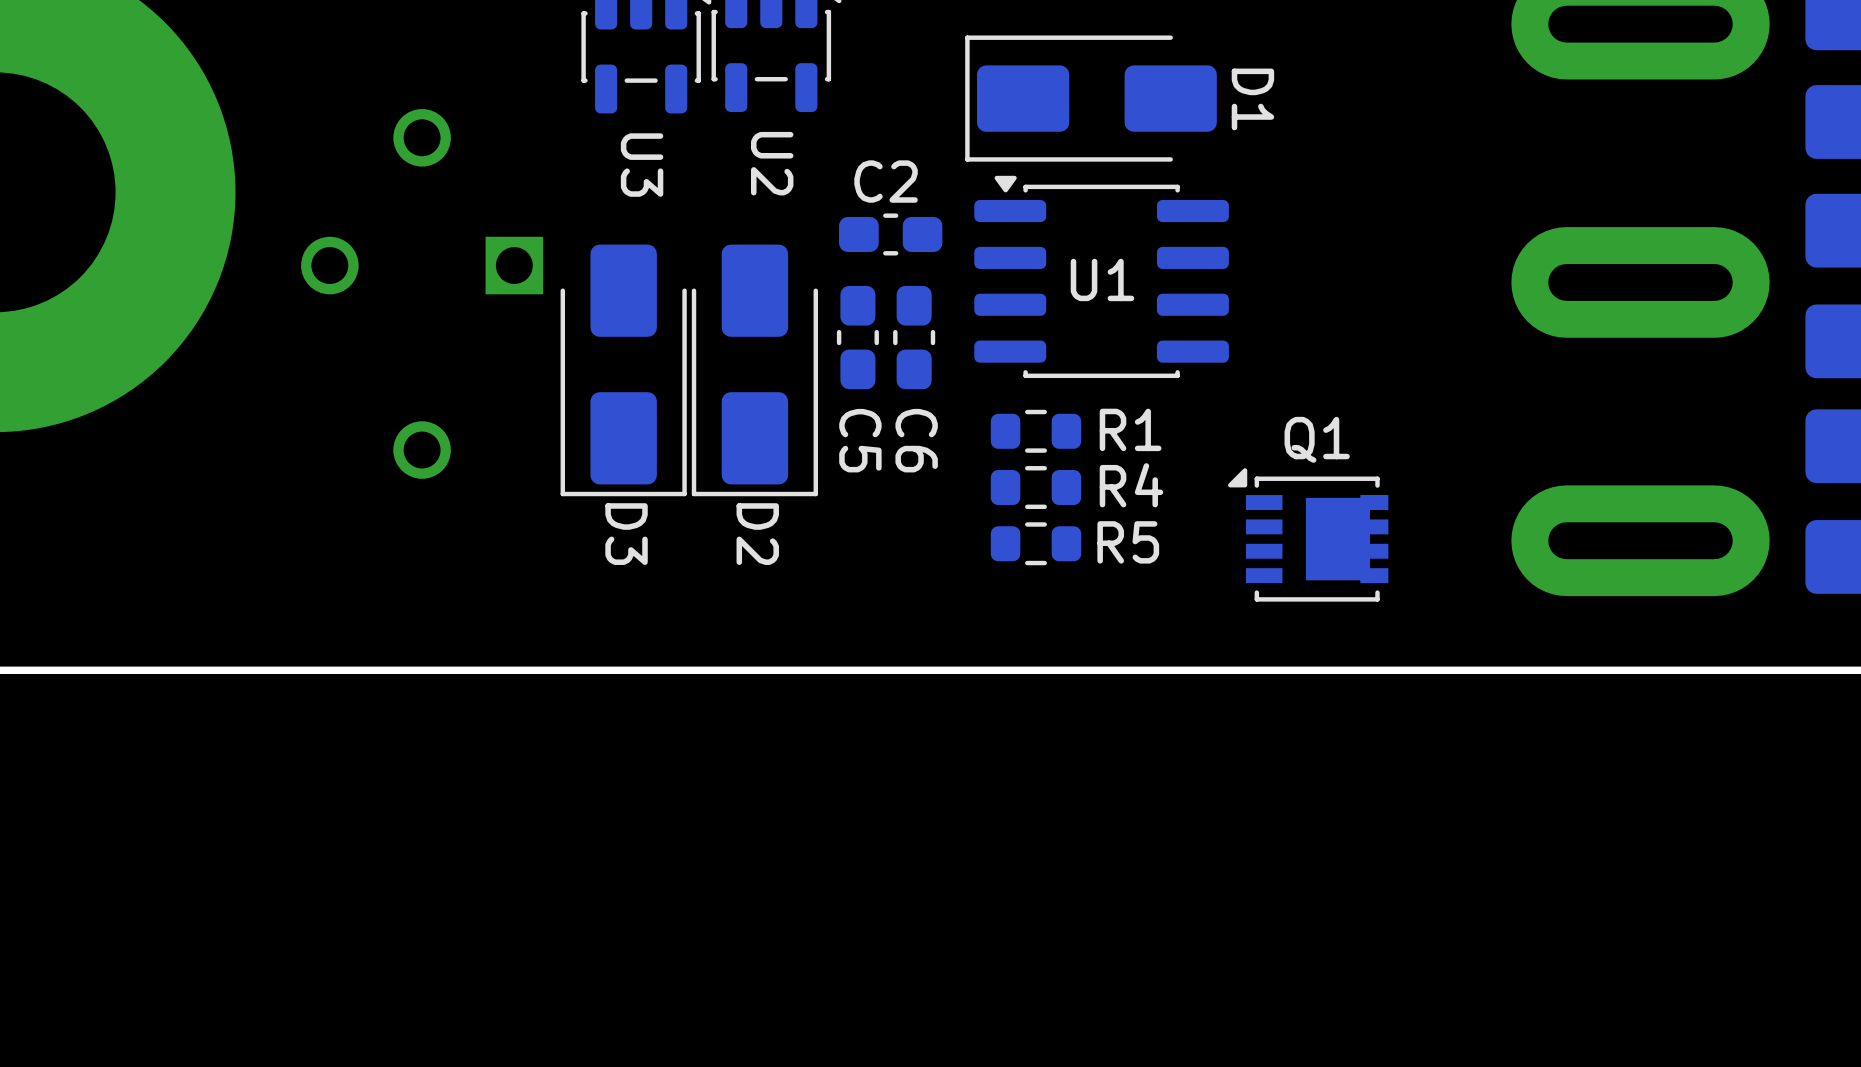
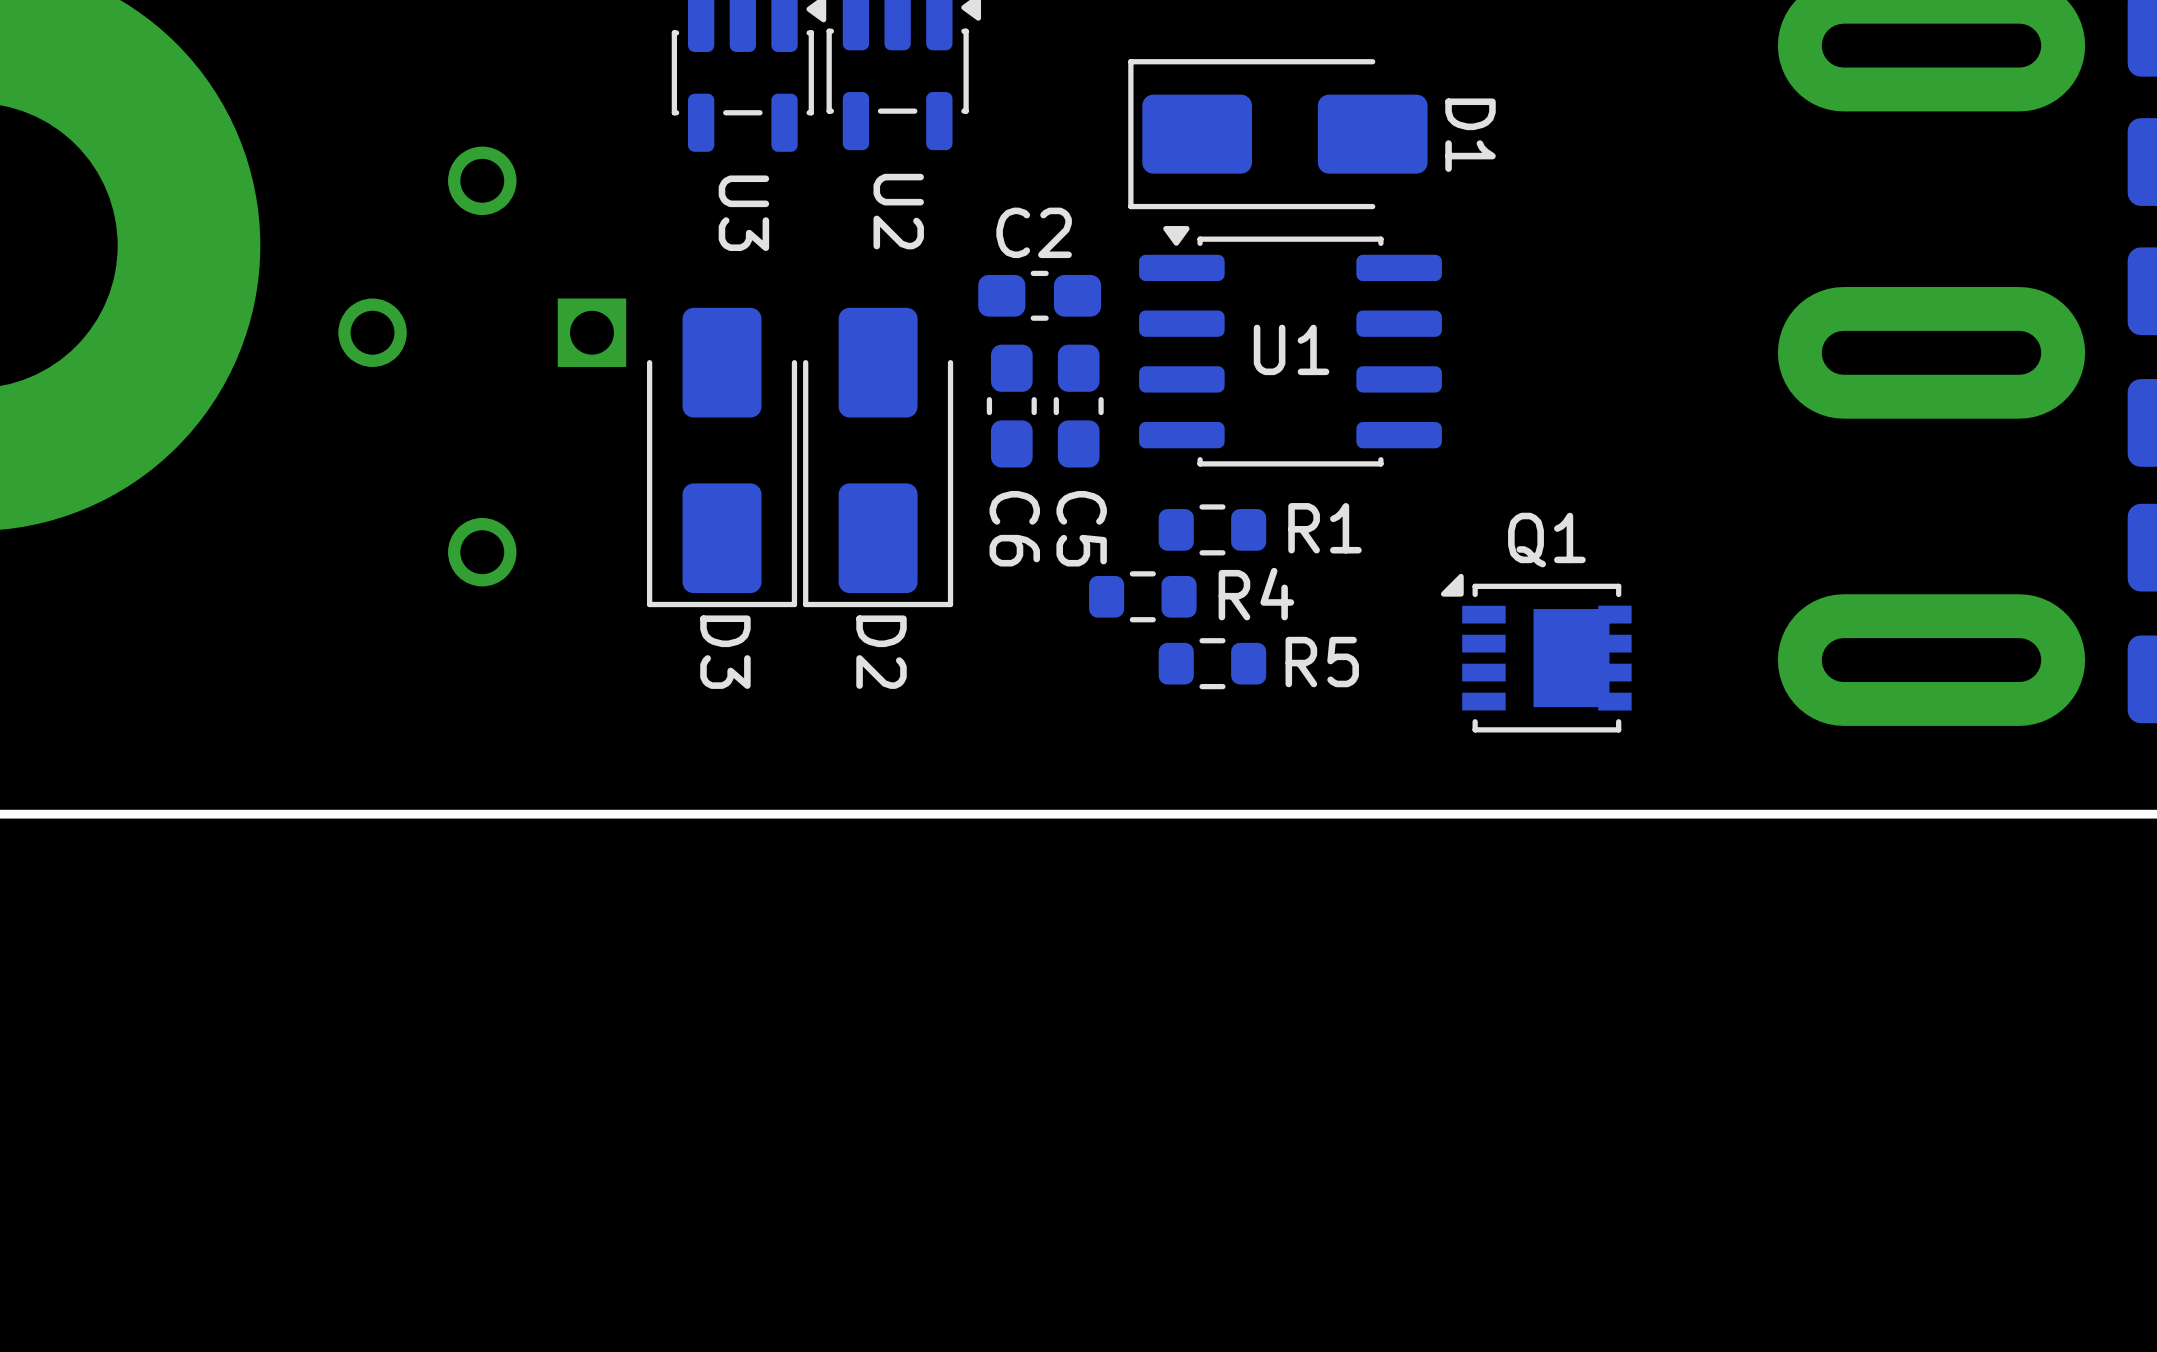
C5 position: (857, 337) -> (1078, 406)
C6 position: (914, 337) -> (1011, 406)
R4 position: (1035, 487) -> (1142, 596)

